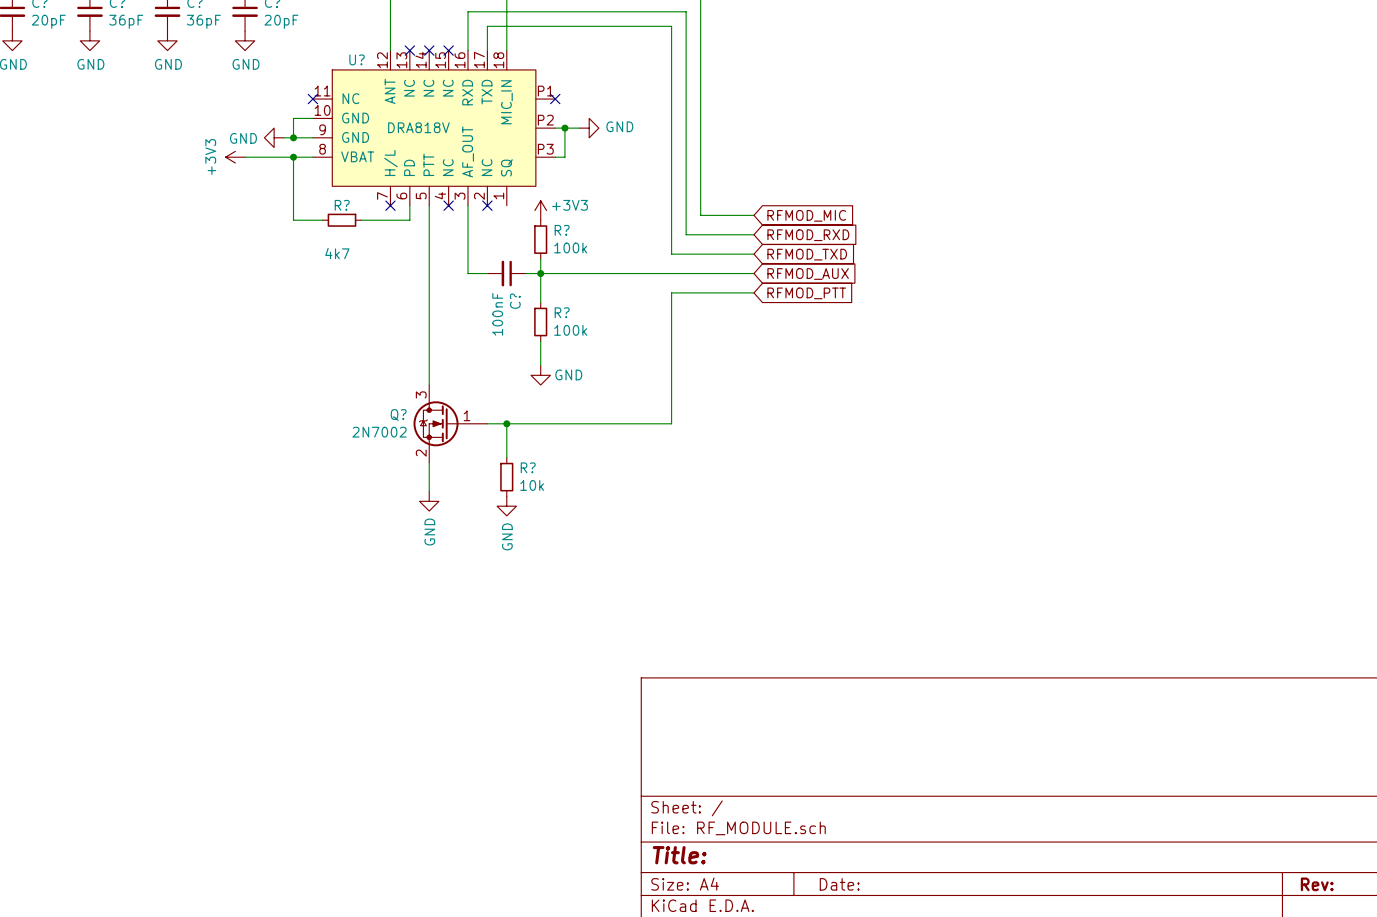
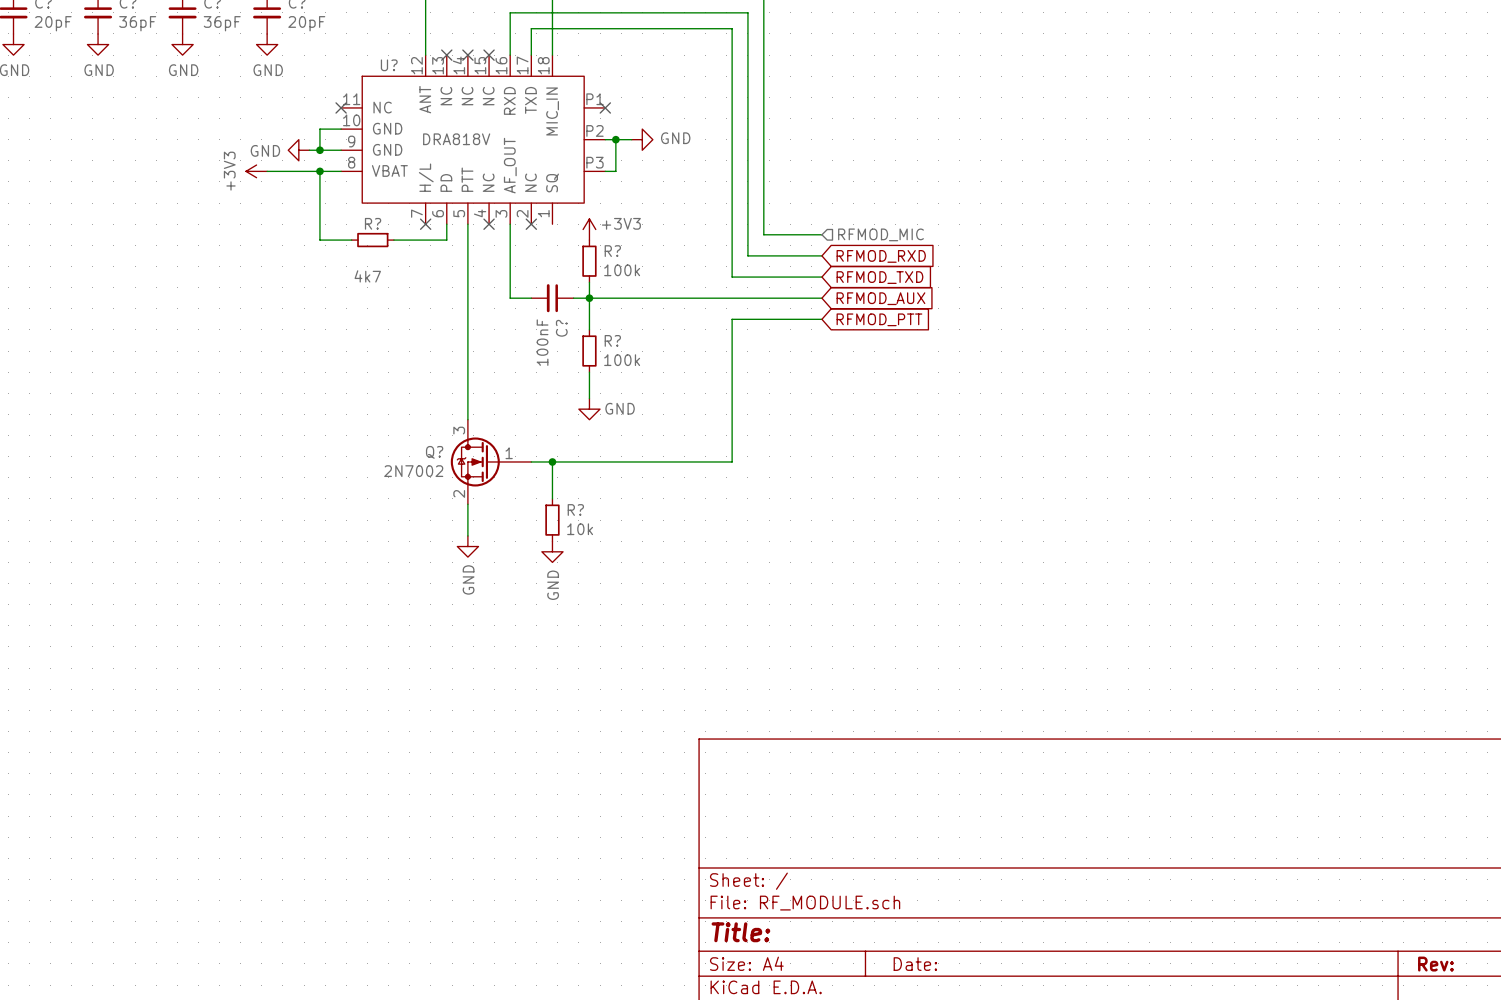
global label: RFMOD_MIC (806, 215) -> none
hierarchical label: none -> RFMOD_MIC (880, 234)

